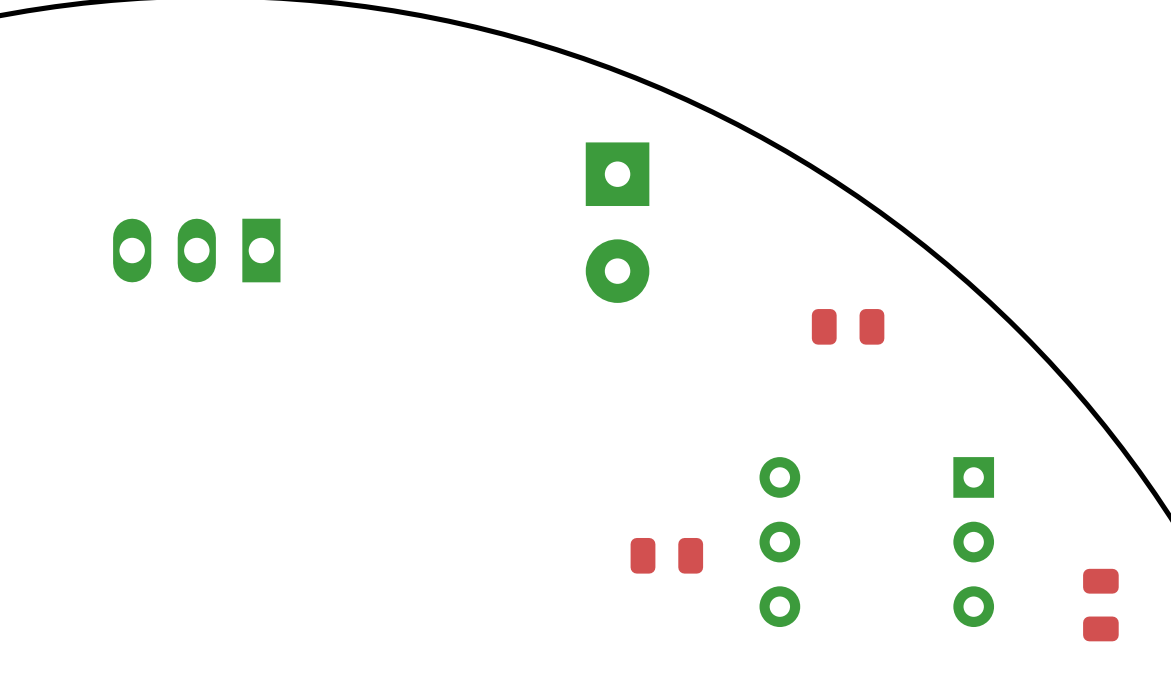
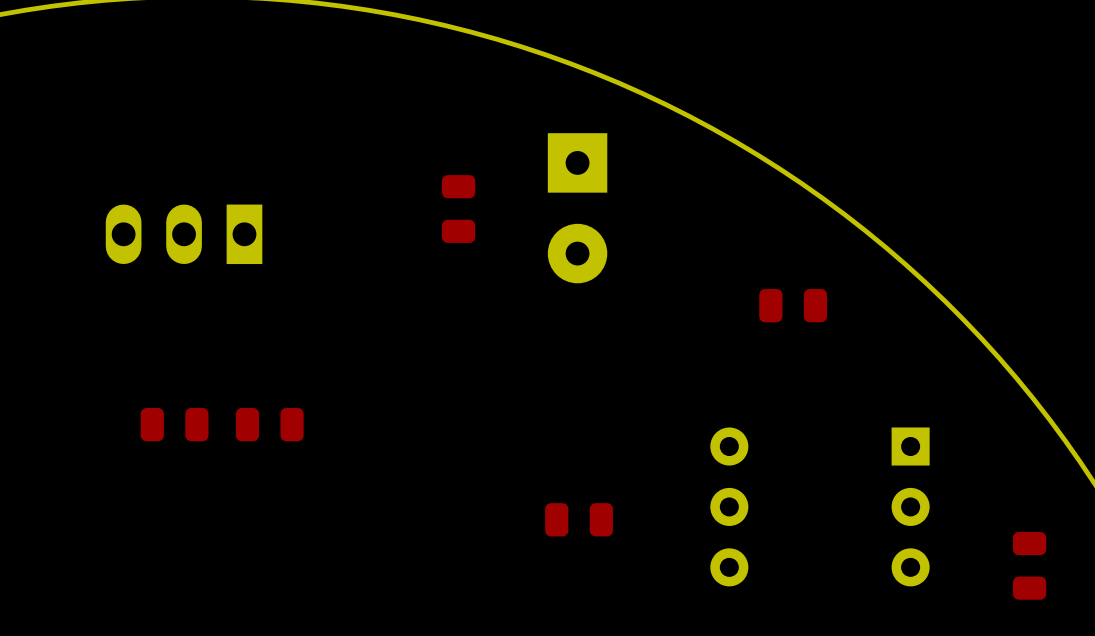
part: none -> (458, 209)
part: none -> (174, 424)
part: none -> (269, 424)
part position: (666, 555) -> (579, 519)

